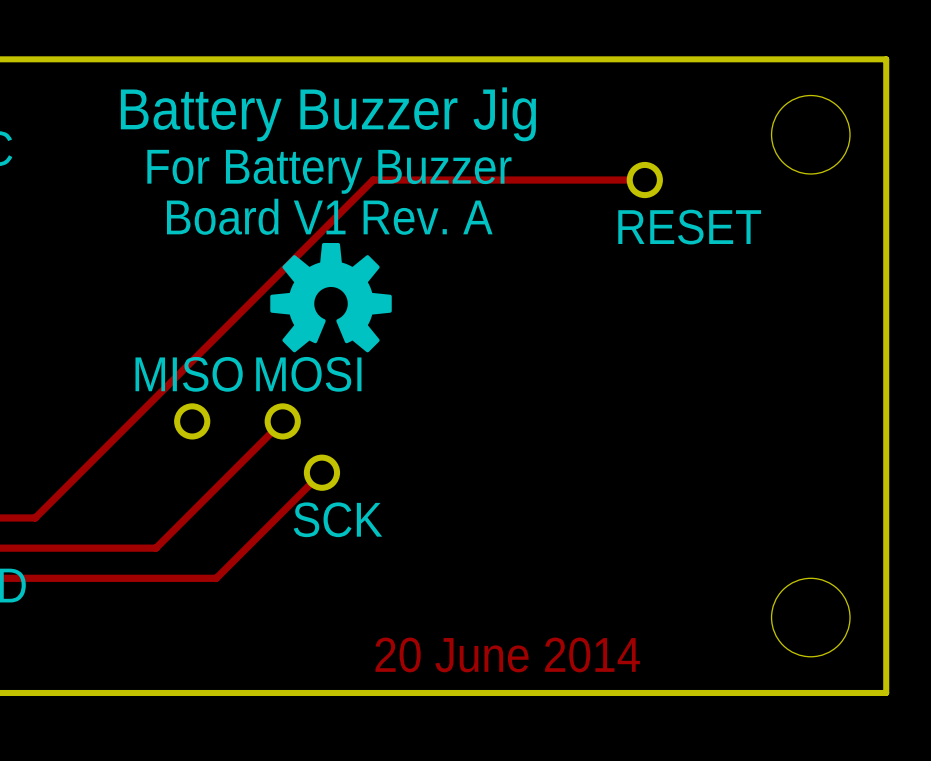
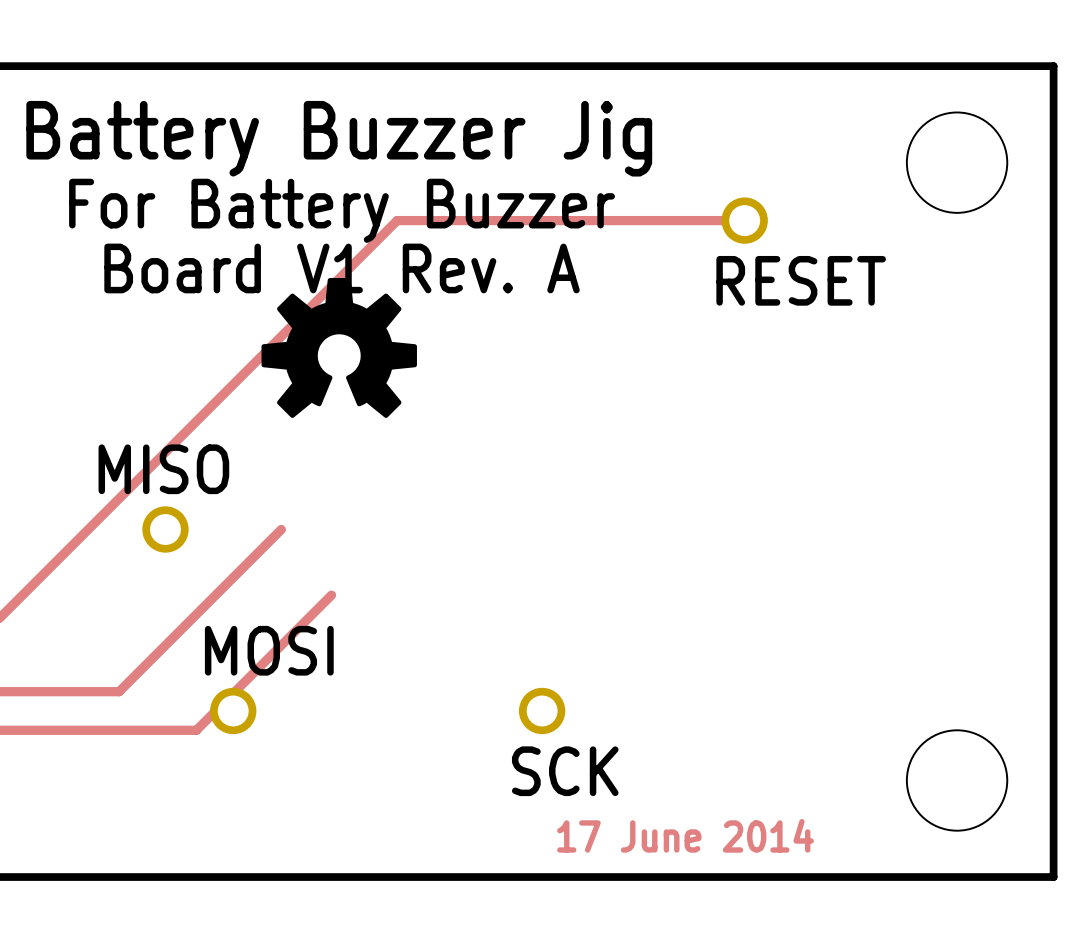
drawing position: (331, 297) -> (339, 347)
MOSI position: (282, 421) -> (233, 710)
SCK position: (321, 472) -> (542, 710)
text: 20 June 2014 (507, 654) -> 17 June 2014 (685, 835)

